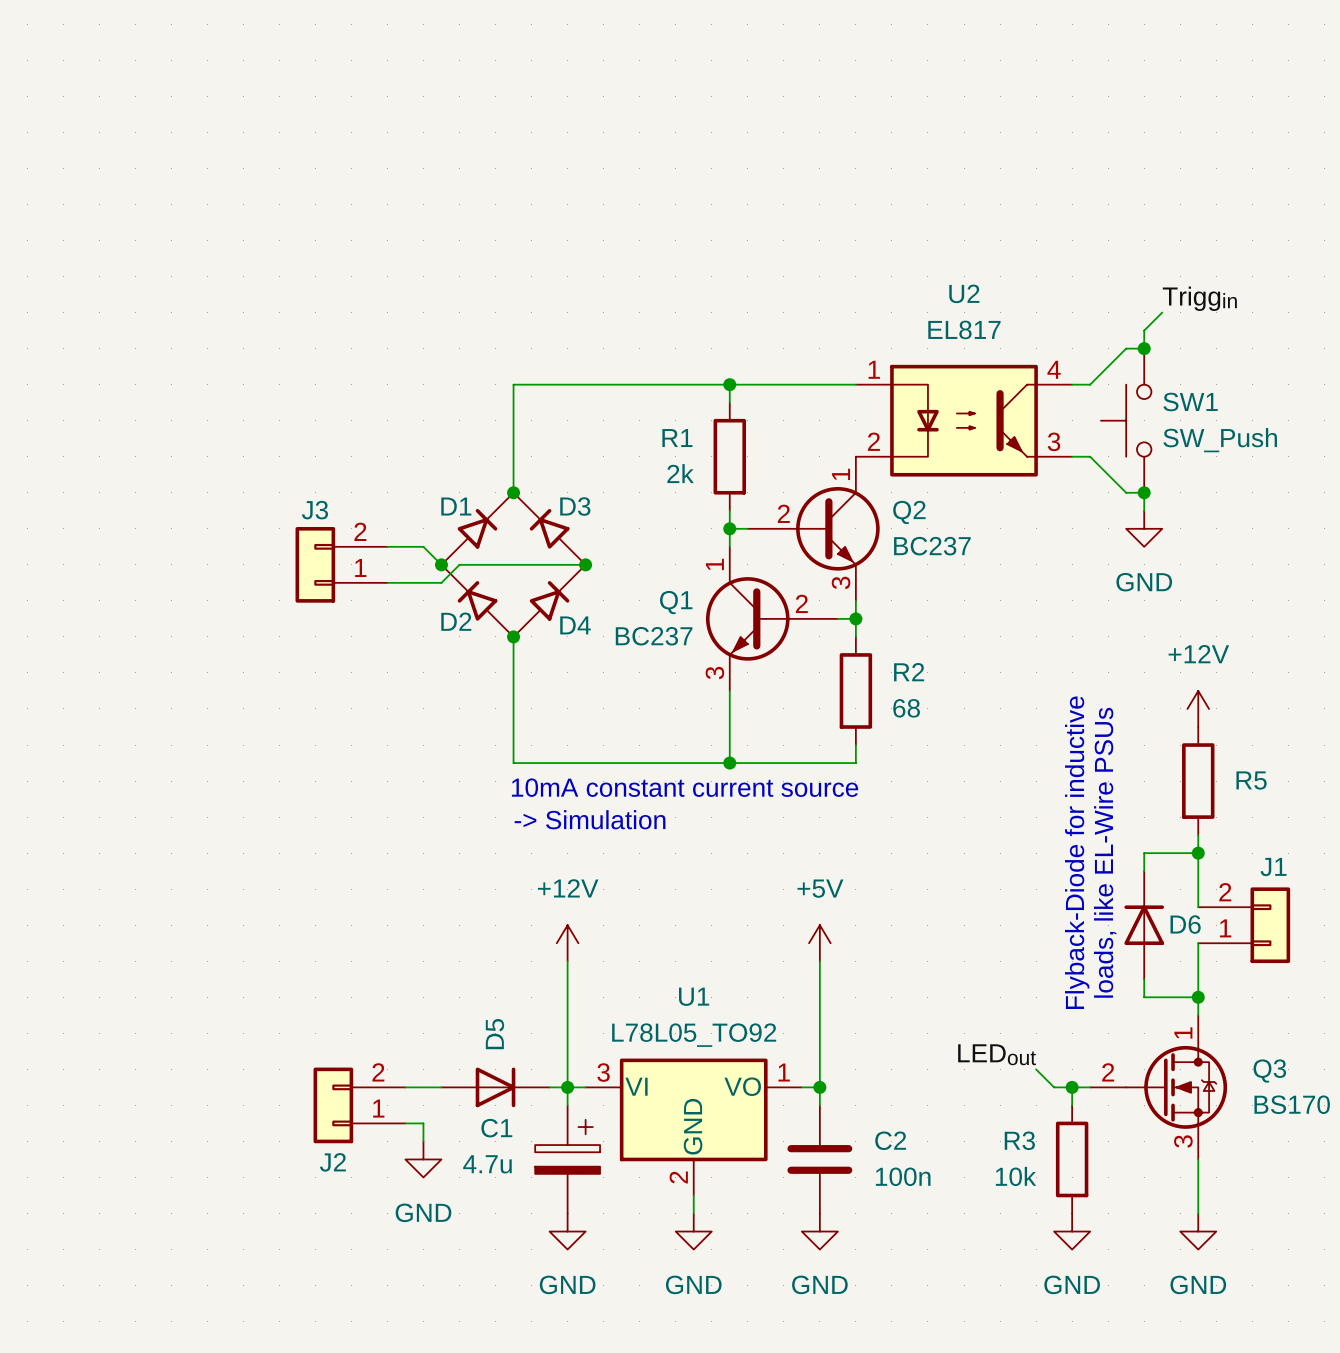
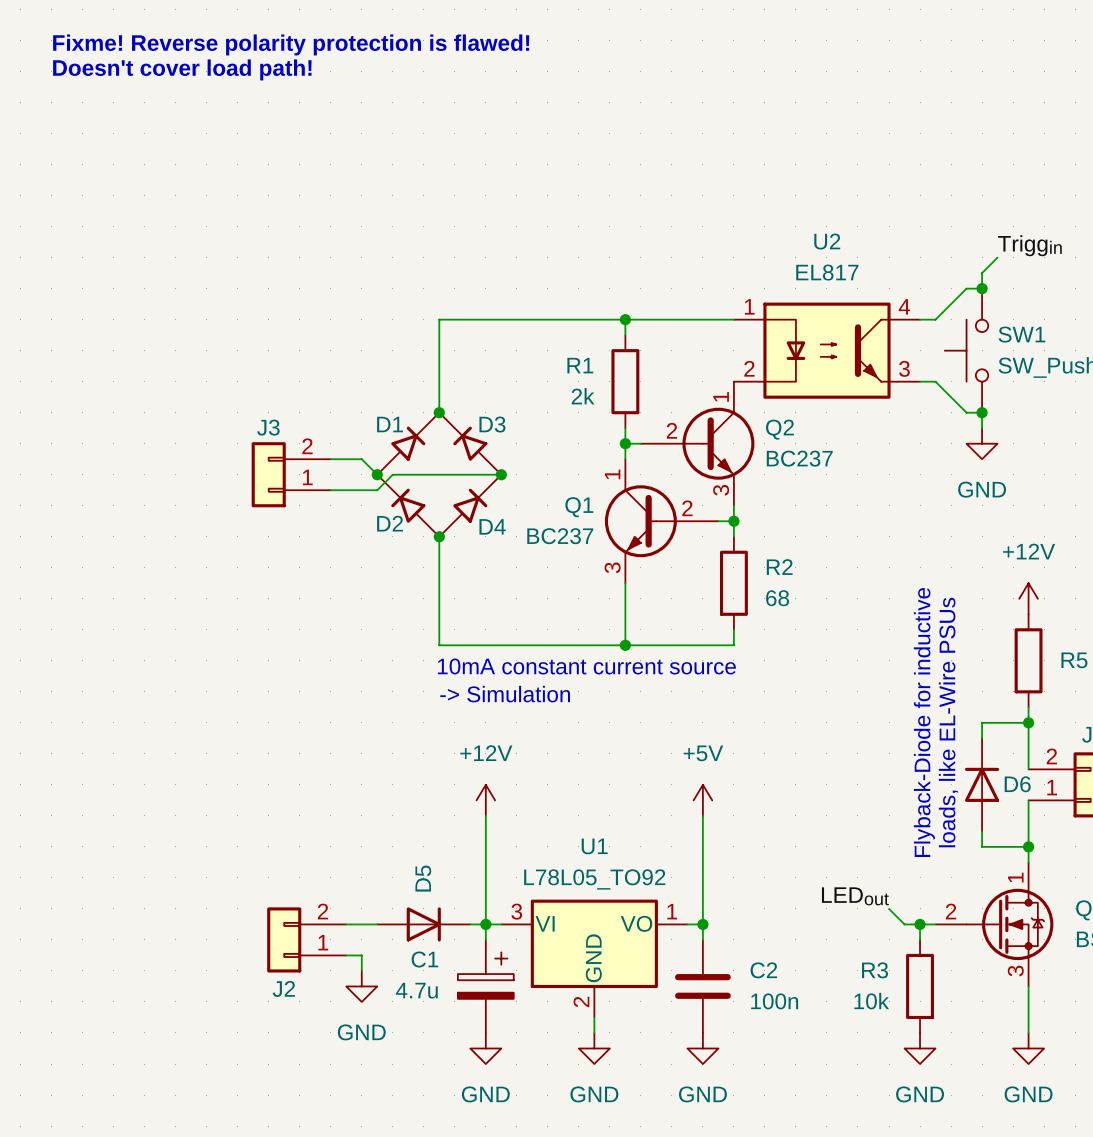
text: none -> Fixme! Reverse polarity protection is flawed! (291, 44)
text: none -> Doesn't cover load path! (182, 69)

